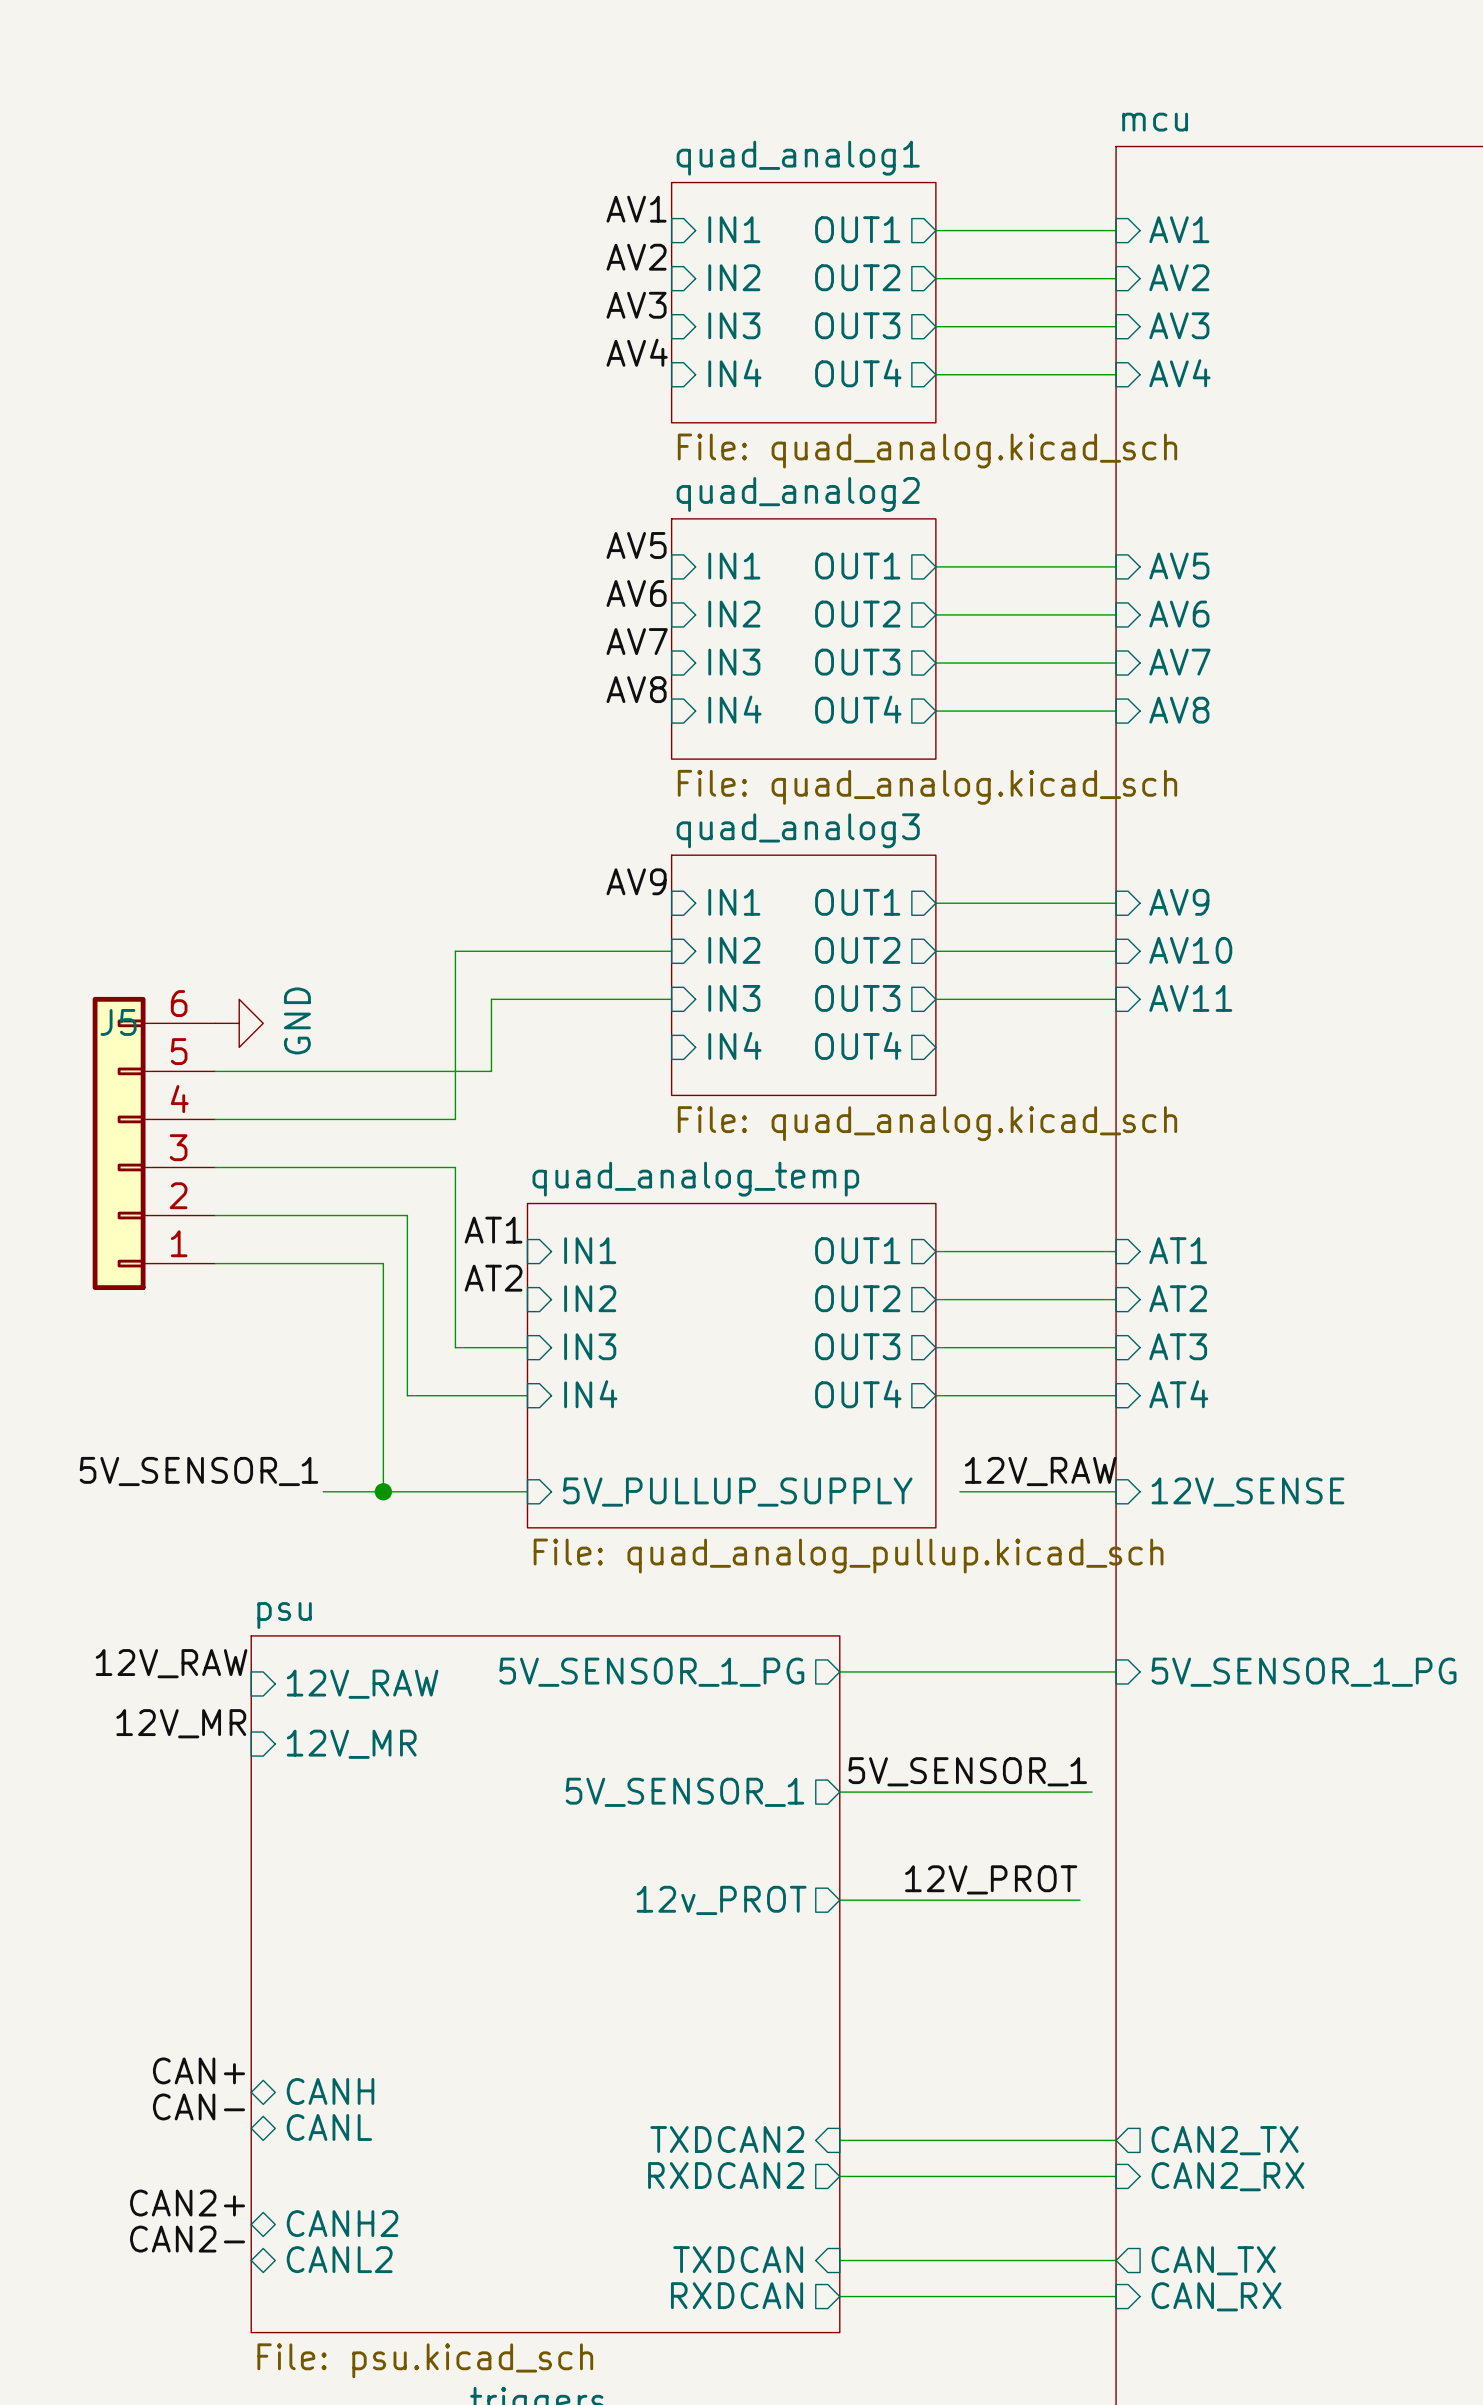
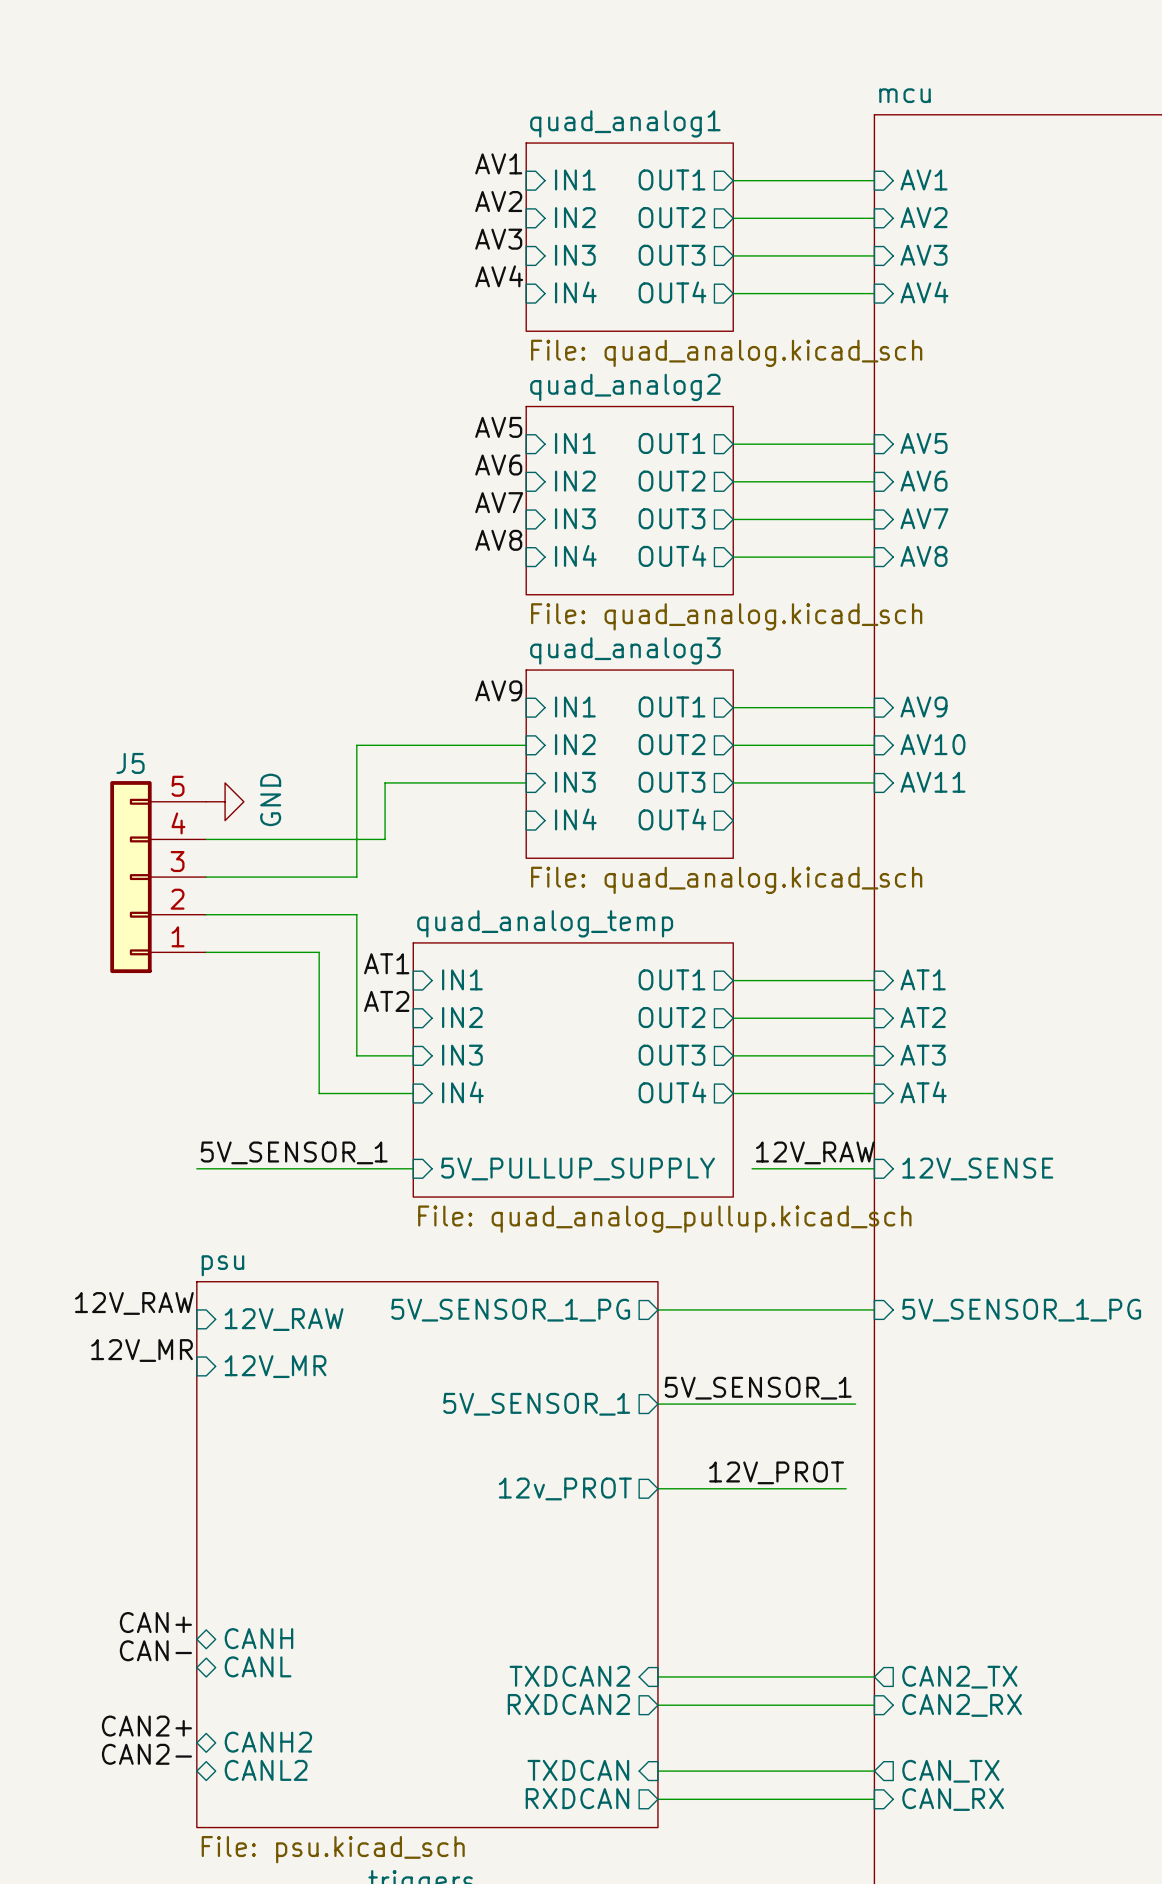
J5 symbol: [92, 996, 216, 1291] -> [110, 781, 207, 974]
power symbol position: GND (239, 1023) -> GND (225, 801)
wire: (215, 1263) (383, 1263) (383, 1491) -> none
label position: 5V_SENSOR_1 (199, 1471) -> 5V_SENSOR_1 (294, 1152)
wire: none -> (196, 1168) (253, 1168)
junction: (383, 1491) -> none

